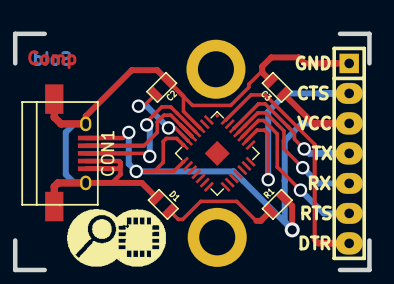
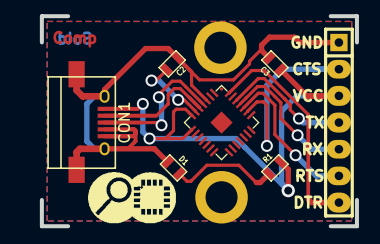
top zone outline: none -> (47, 21) (47, 220) (351, 220) (351, 21) (47, 21)

